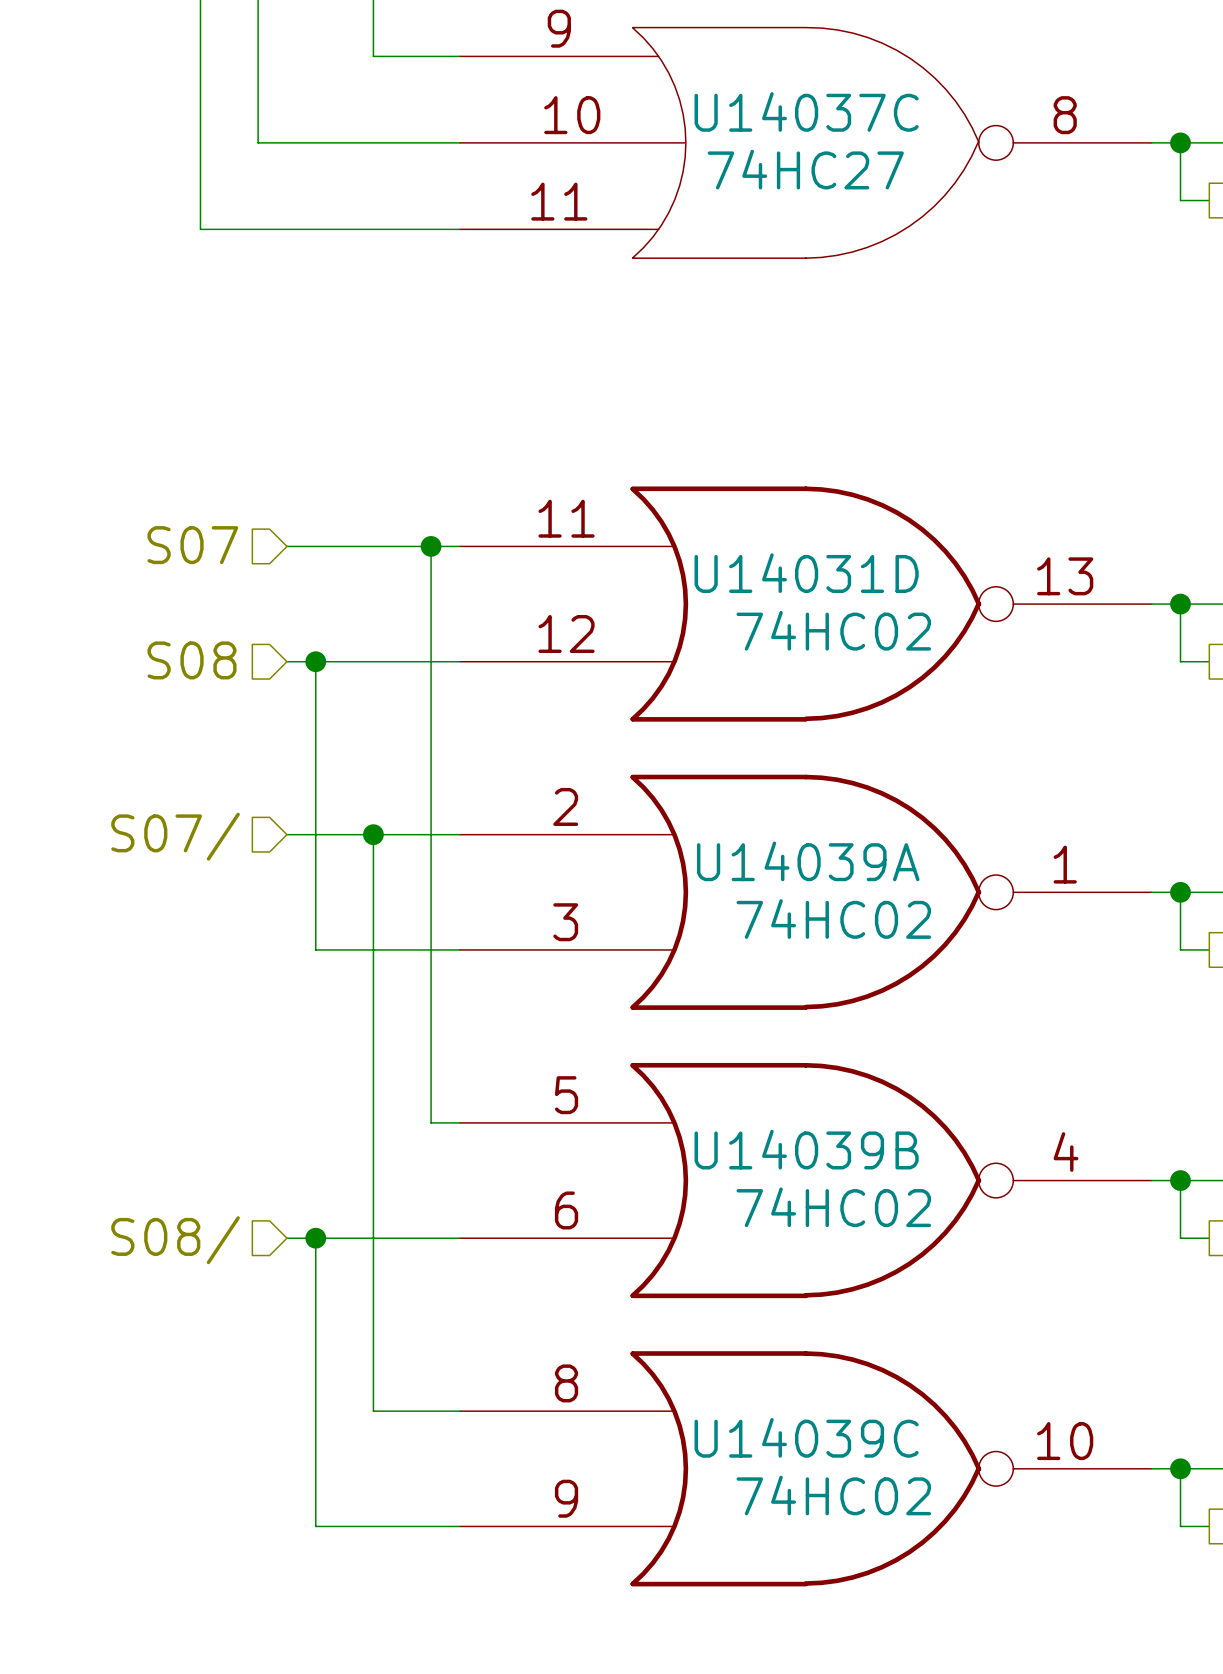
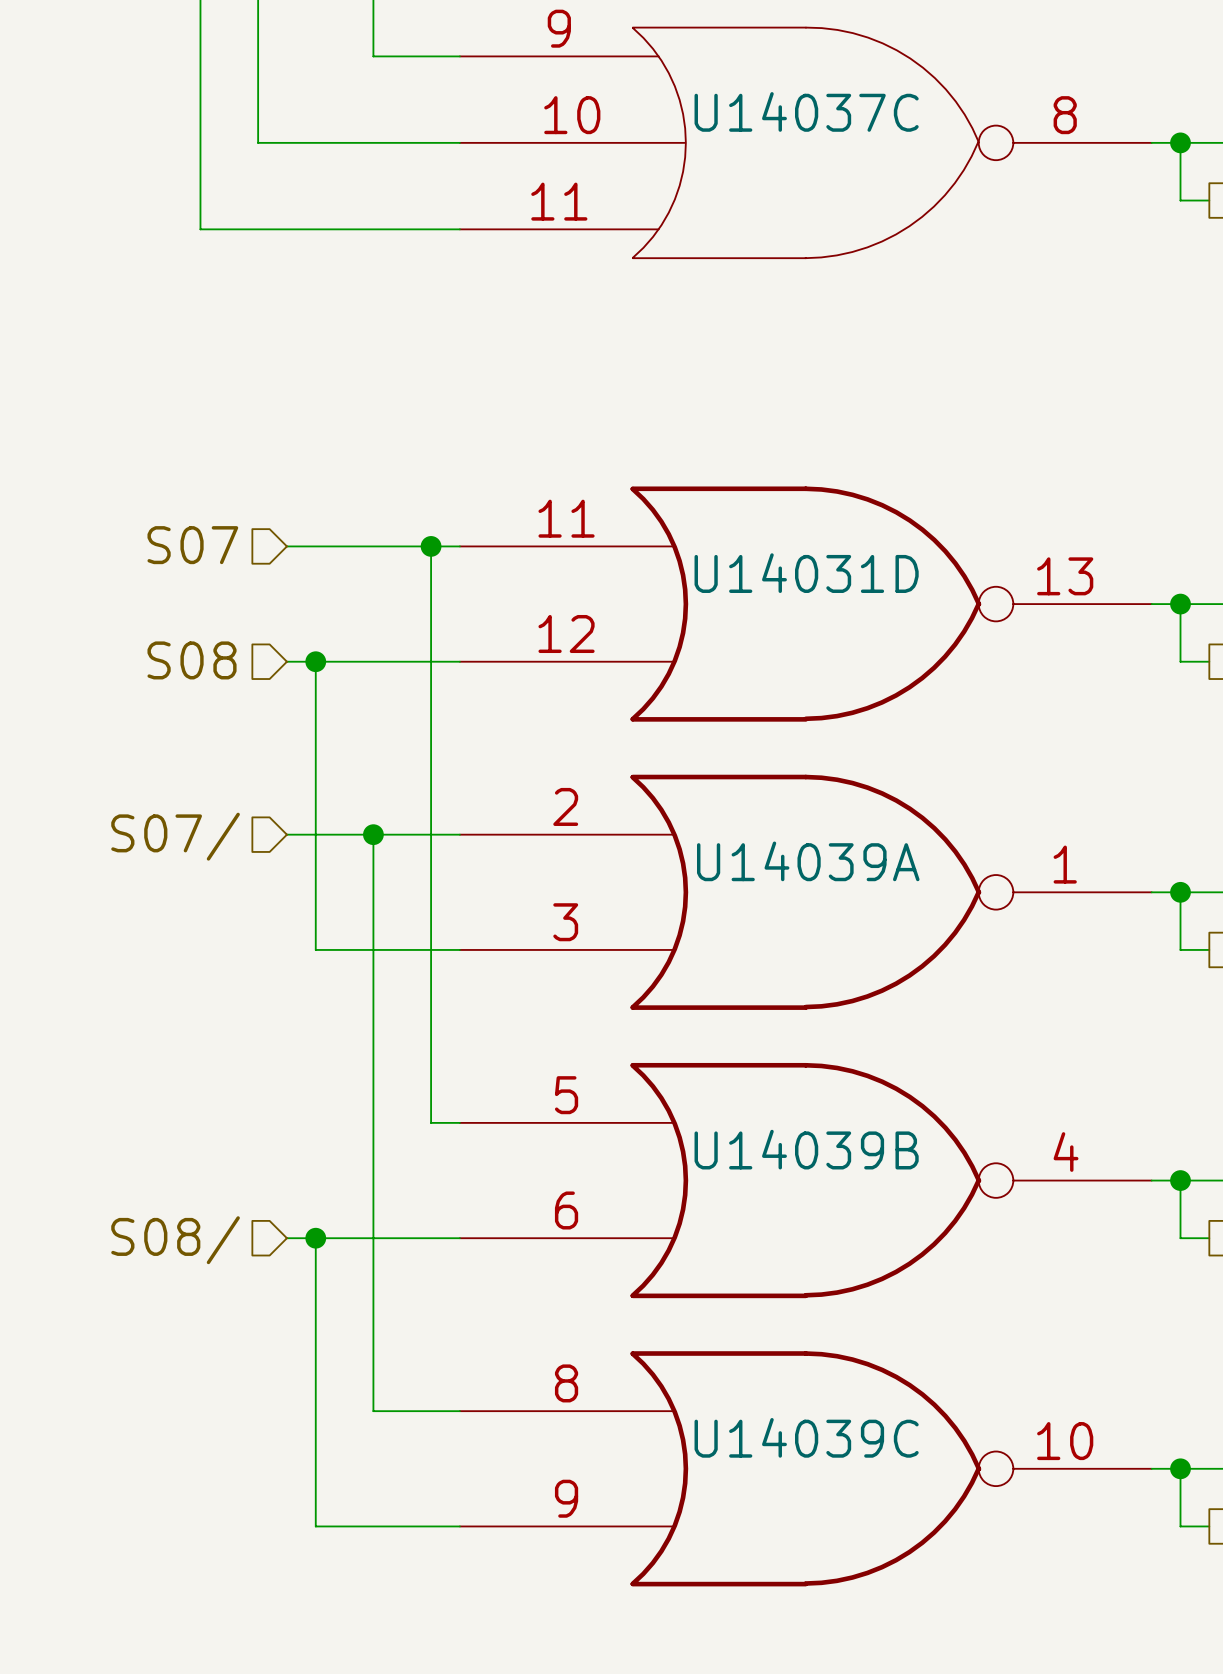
U14037C value: 74HC27 (805, 169) -> none
U14031D value: 74HC02 (833, 630) -> none
U14039A value: 74HC02 (833, 919) -> none
U14039B value: 74HC02 (833, 1207) -> none
U14039C value: 74HC02 (833, 1495) -> none

